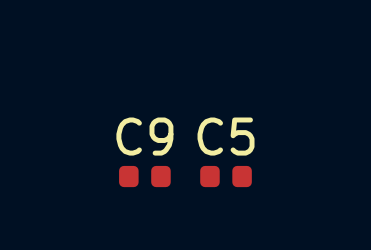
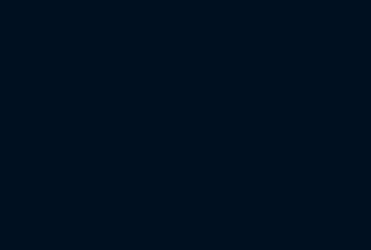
C9: (144, 176) -> none
C5: (226, 176) -> none

